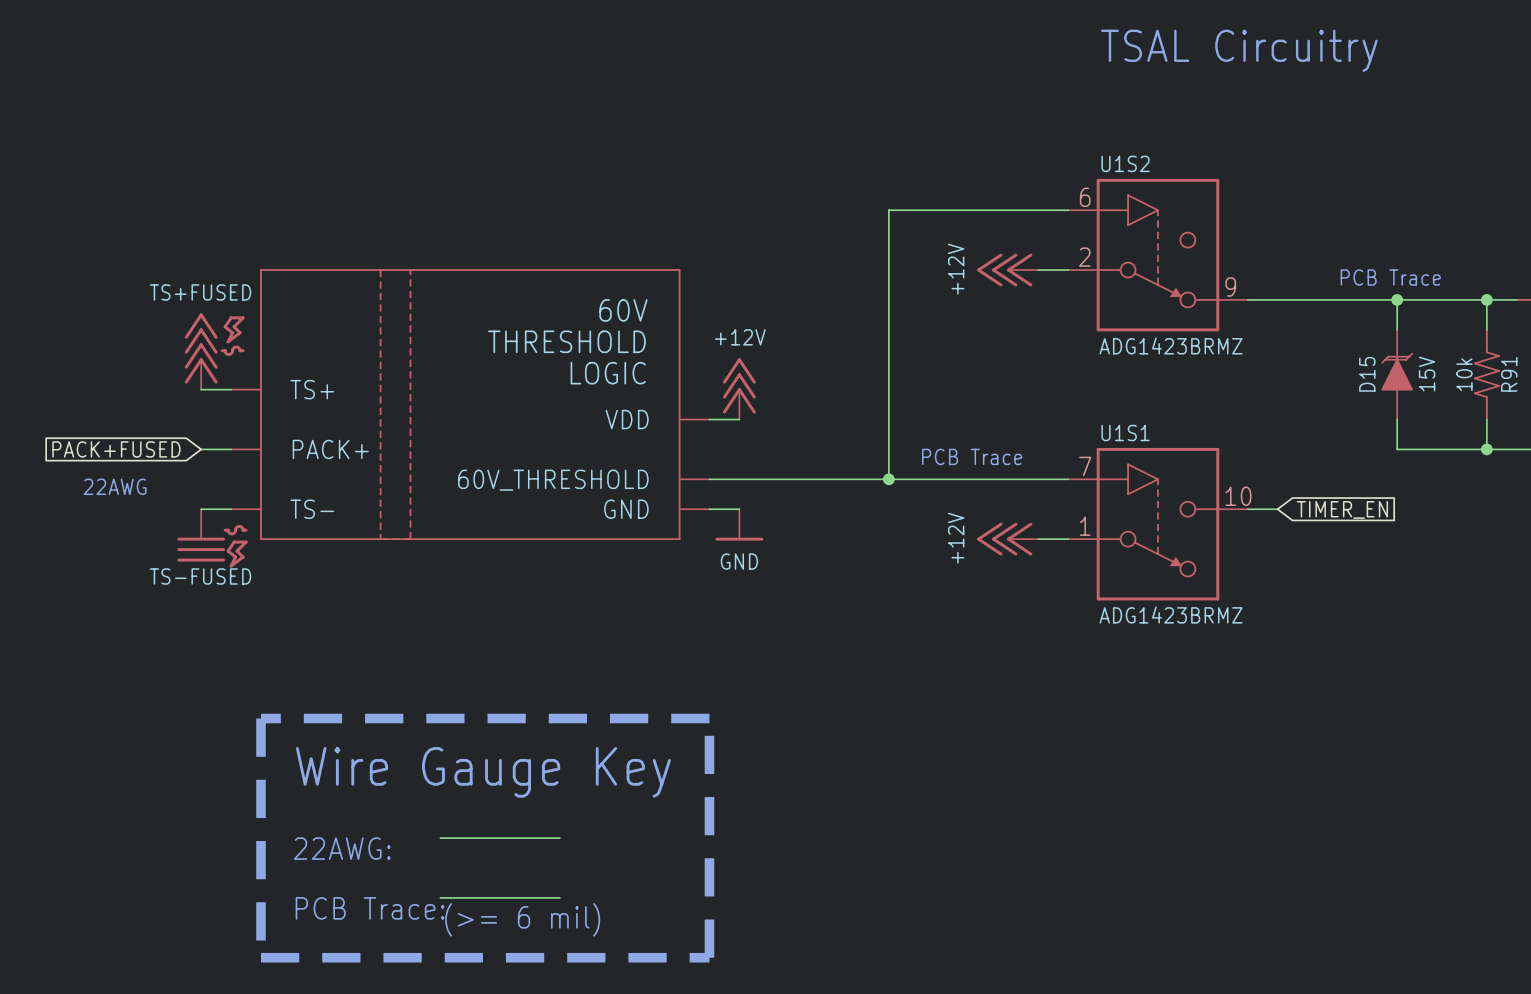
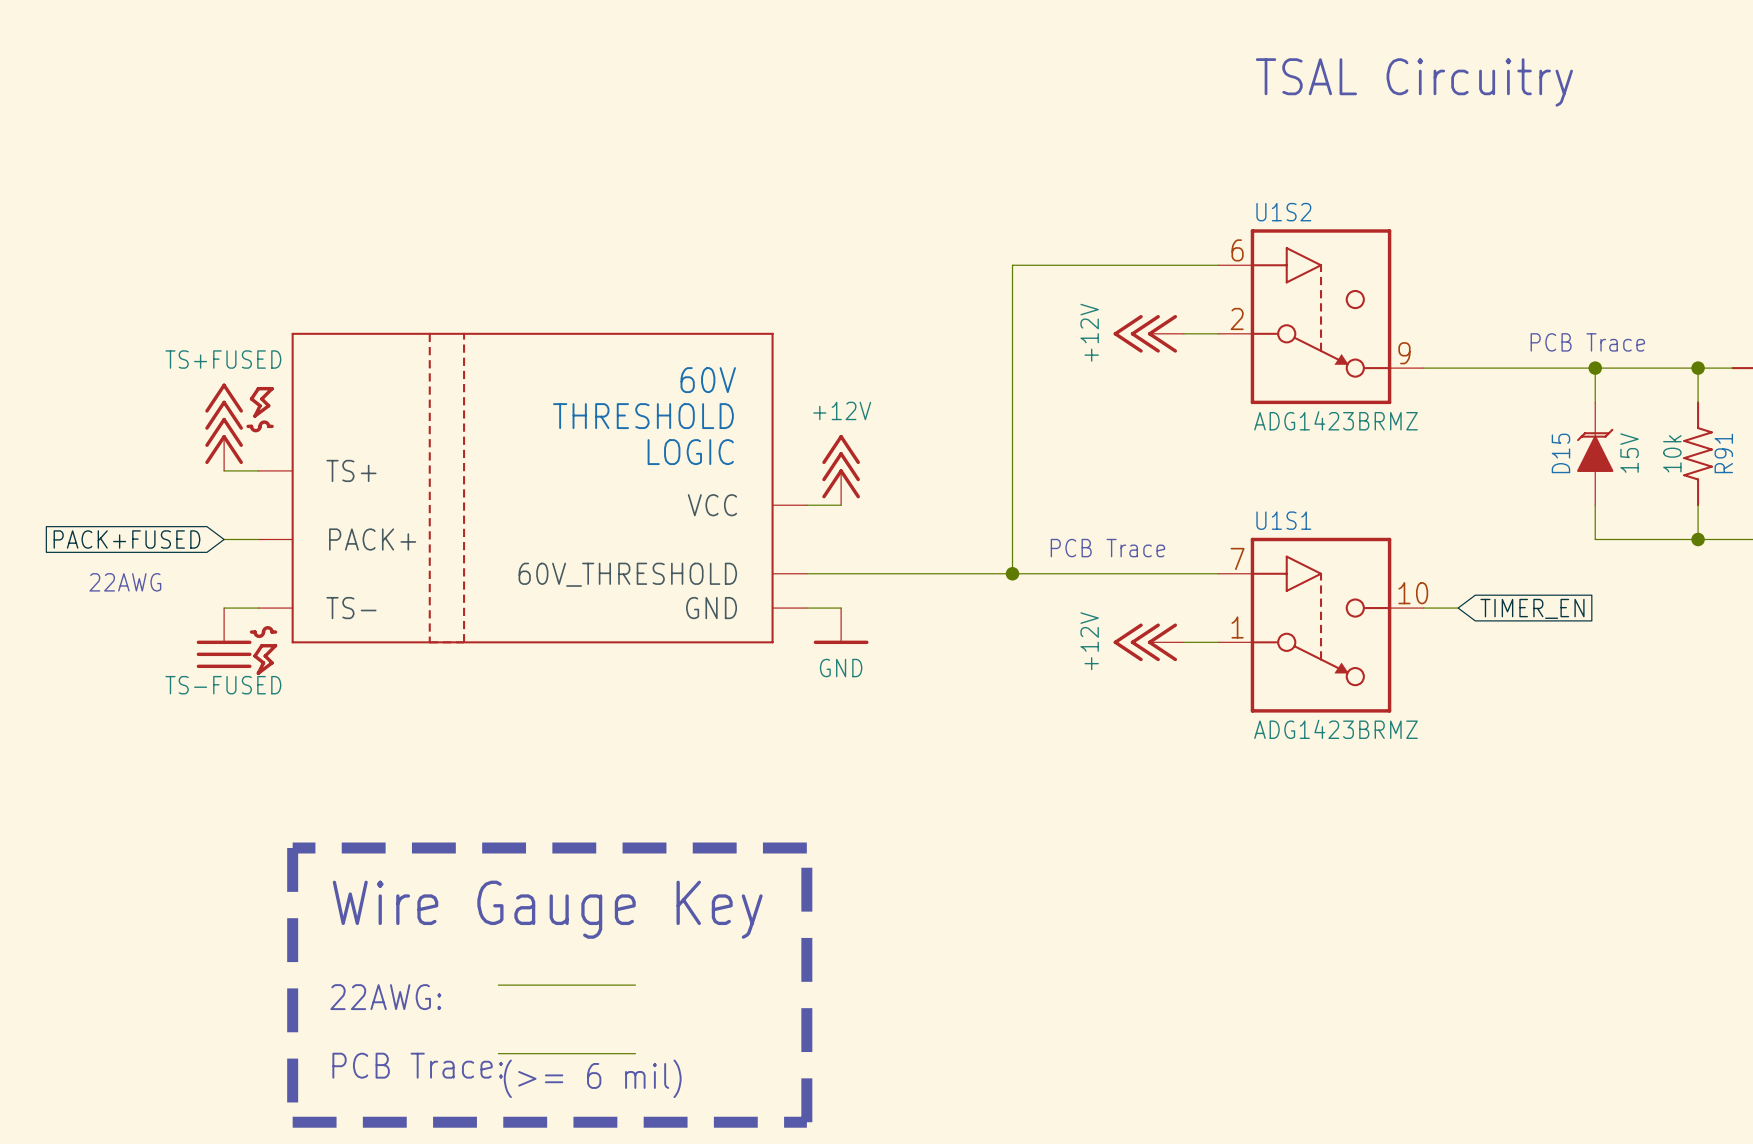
part pin name: VDD (627, 419) -> VCC (712, 505)

